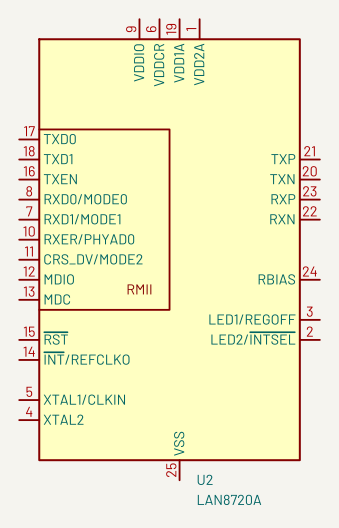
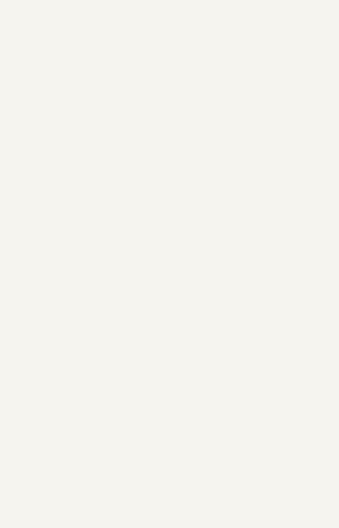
U2: LAN8720A (169, 249) -> none

